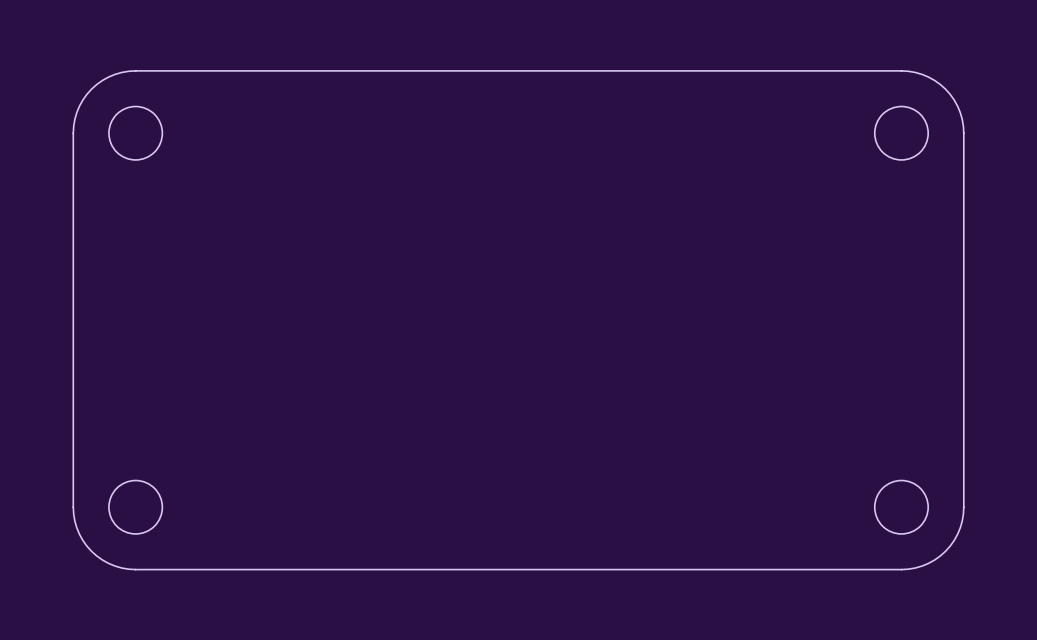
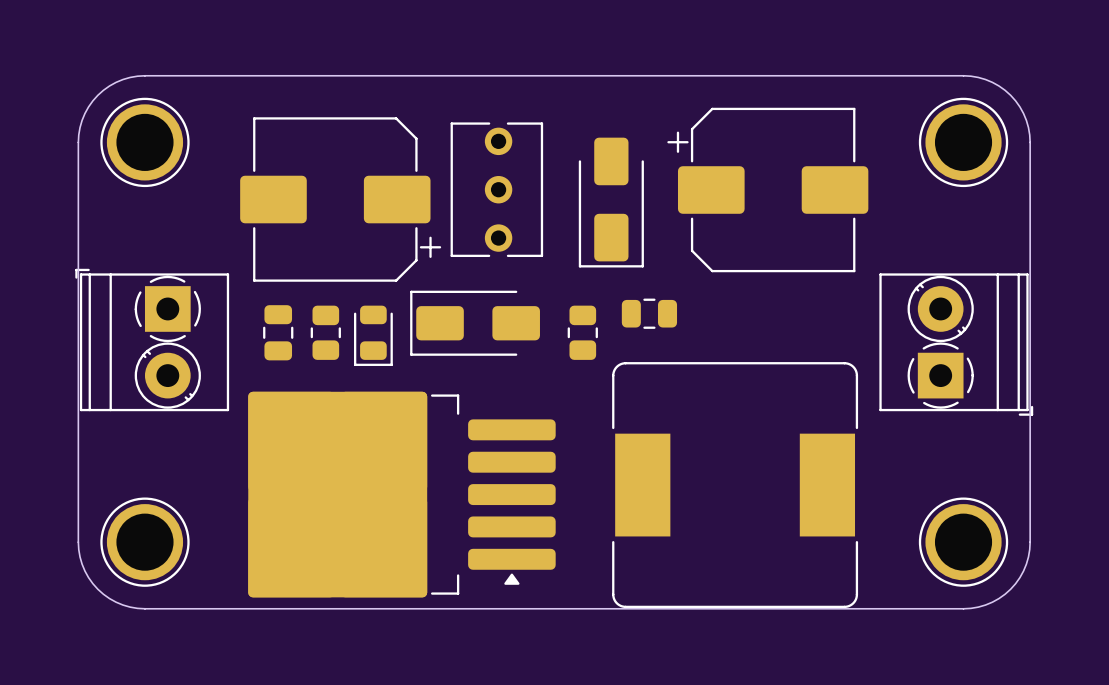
round board edge: [108, 106, 163, 161] -> none
round board edge: [874, 106, 929, 161] -> none
part: none -> (144, 142)
part: none -> (963, 142)
part: none -> (496, 189)
part: none -> (767, 190)
part: none -> (340, 199)
part: none -> (611, 202)
part: none -> (649, 313)
part: none -> (475, 323)
part: none -> (278, 332)
part: none -> (325, 332)
part: none -> (582, 332)
part: none -> (373, 335)
part: none -> (152, 340)
part: none -> (956, 344)
part: none -> (735, 485)
part: none -> (401, 494)
round board edge: [108, 480, 163, 535] -> none
round board edge: [874, 480, 929, 535] -> none
part: none -> (144, 542)
part: none -> (963, 542)

